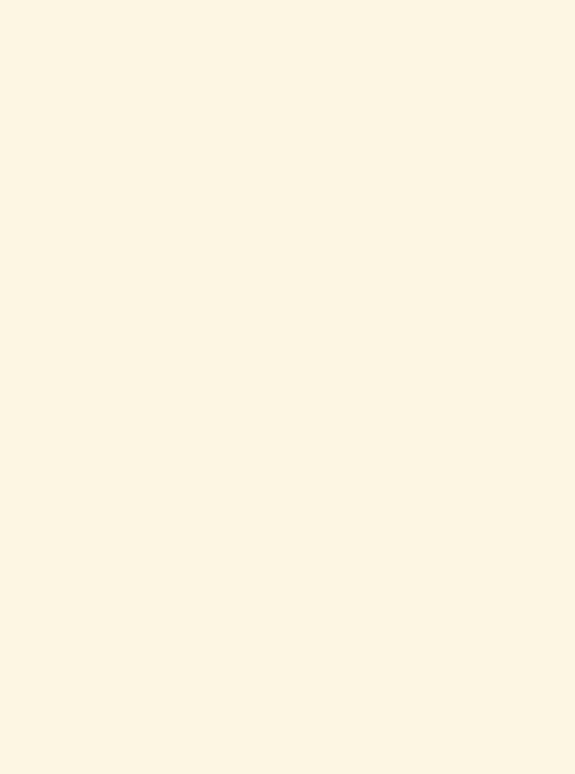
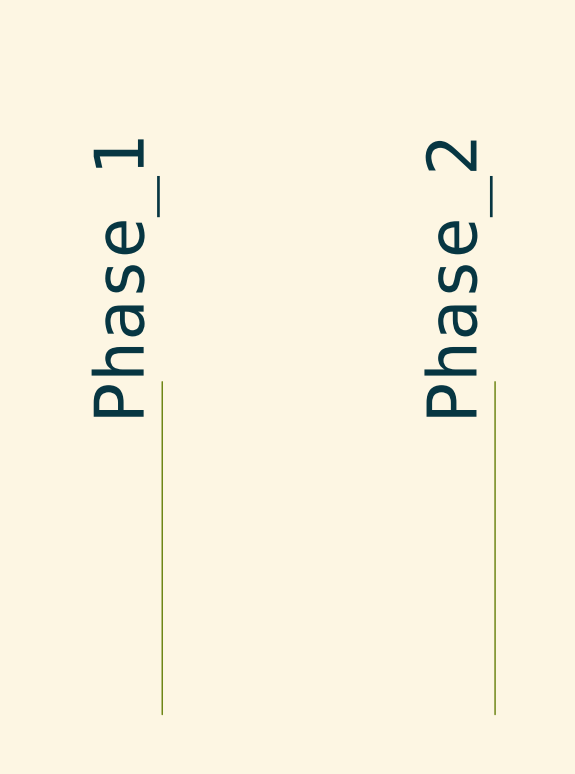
label: none -> Phase_1 (125, 278)
label: none -> Phase_2 (458, 278)
wire: none -> (162, 381) (162, 714)
wire: none -> (495, 381) (495, 714)

